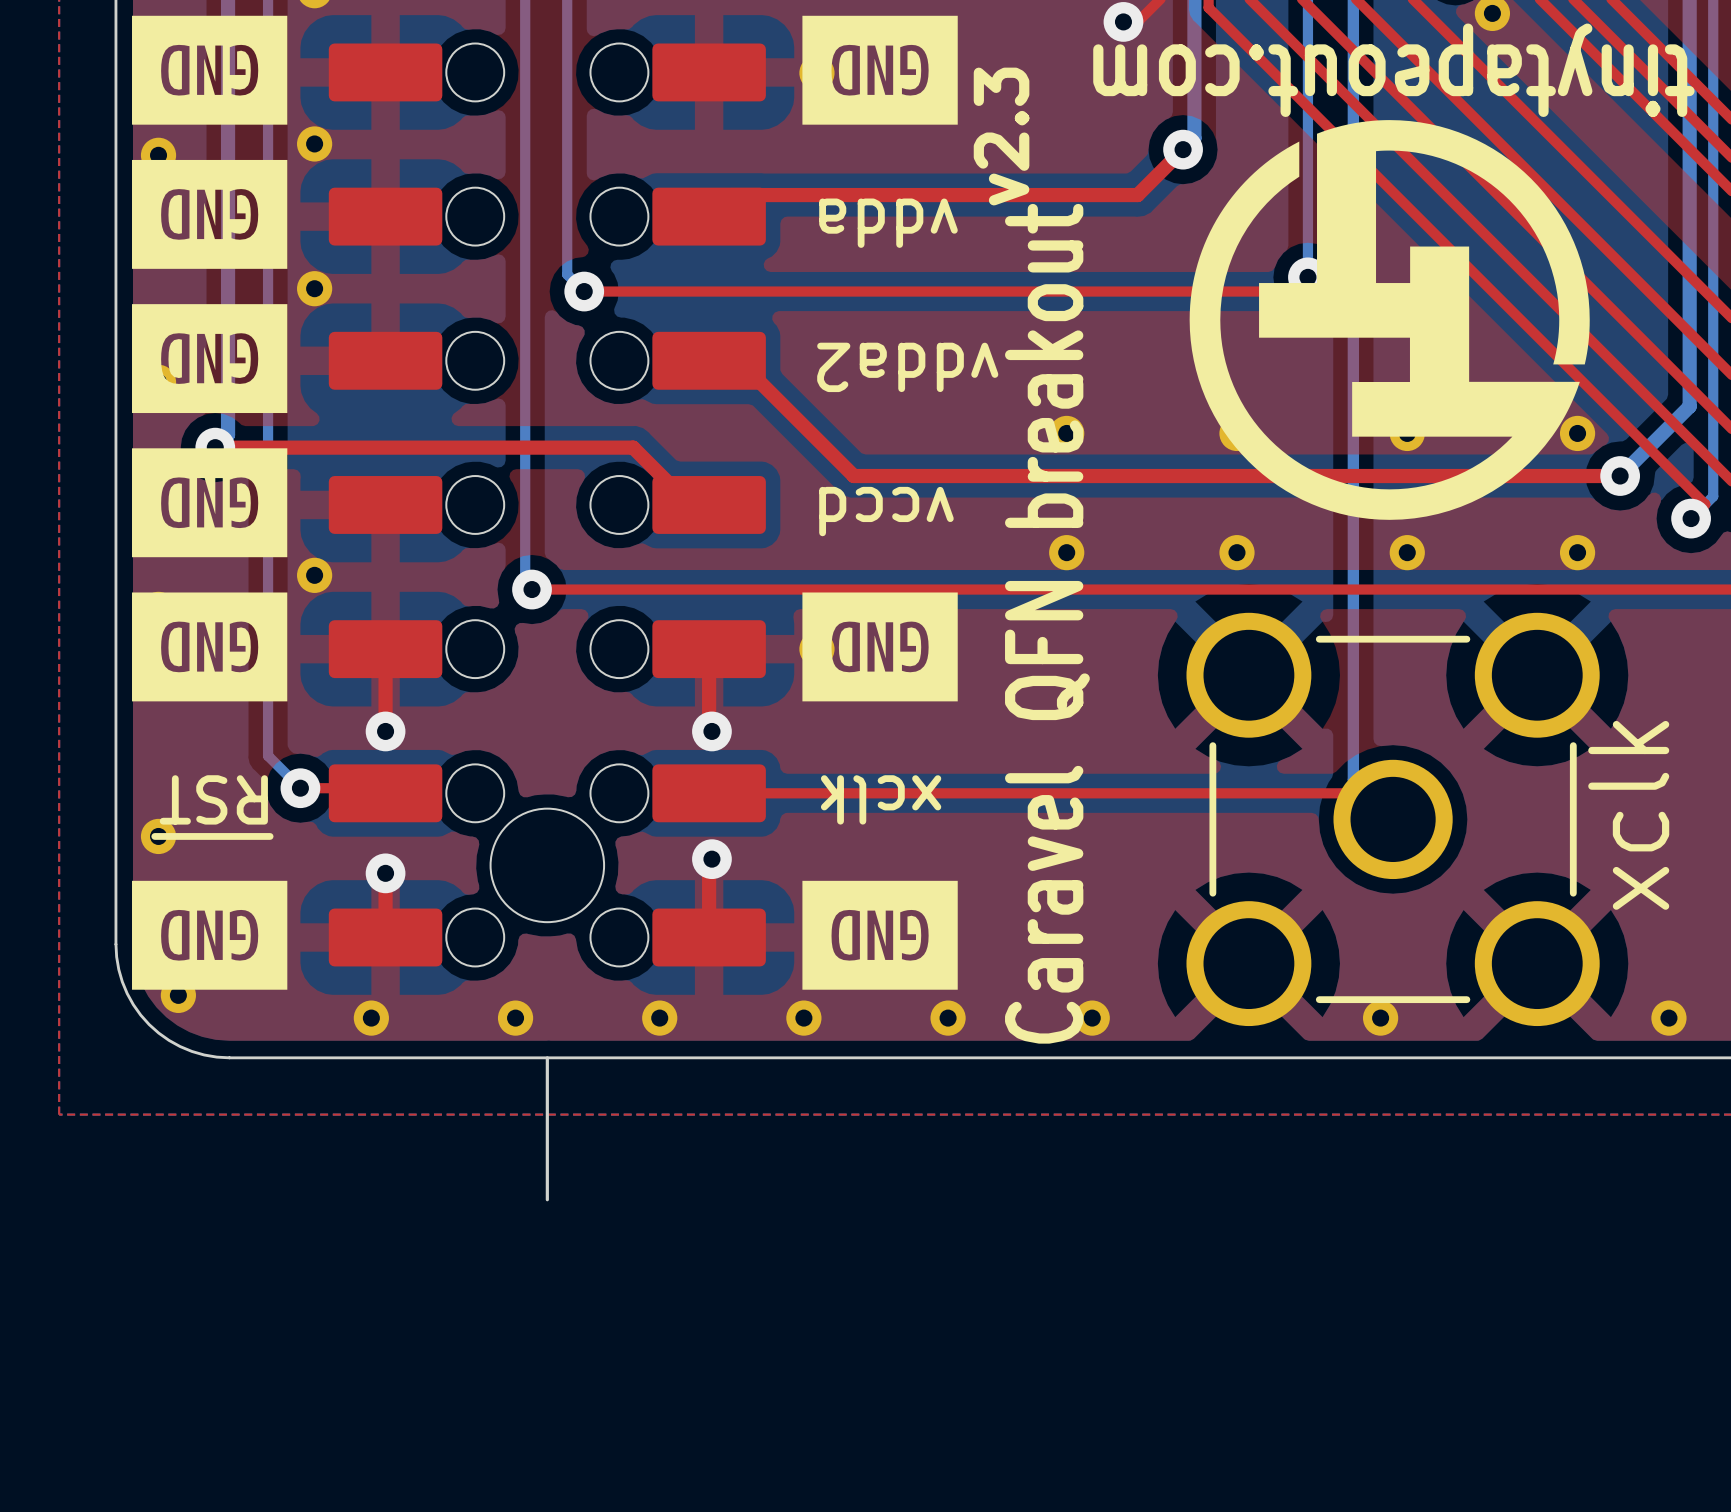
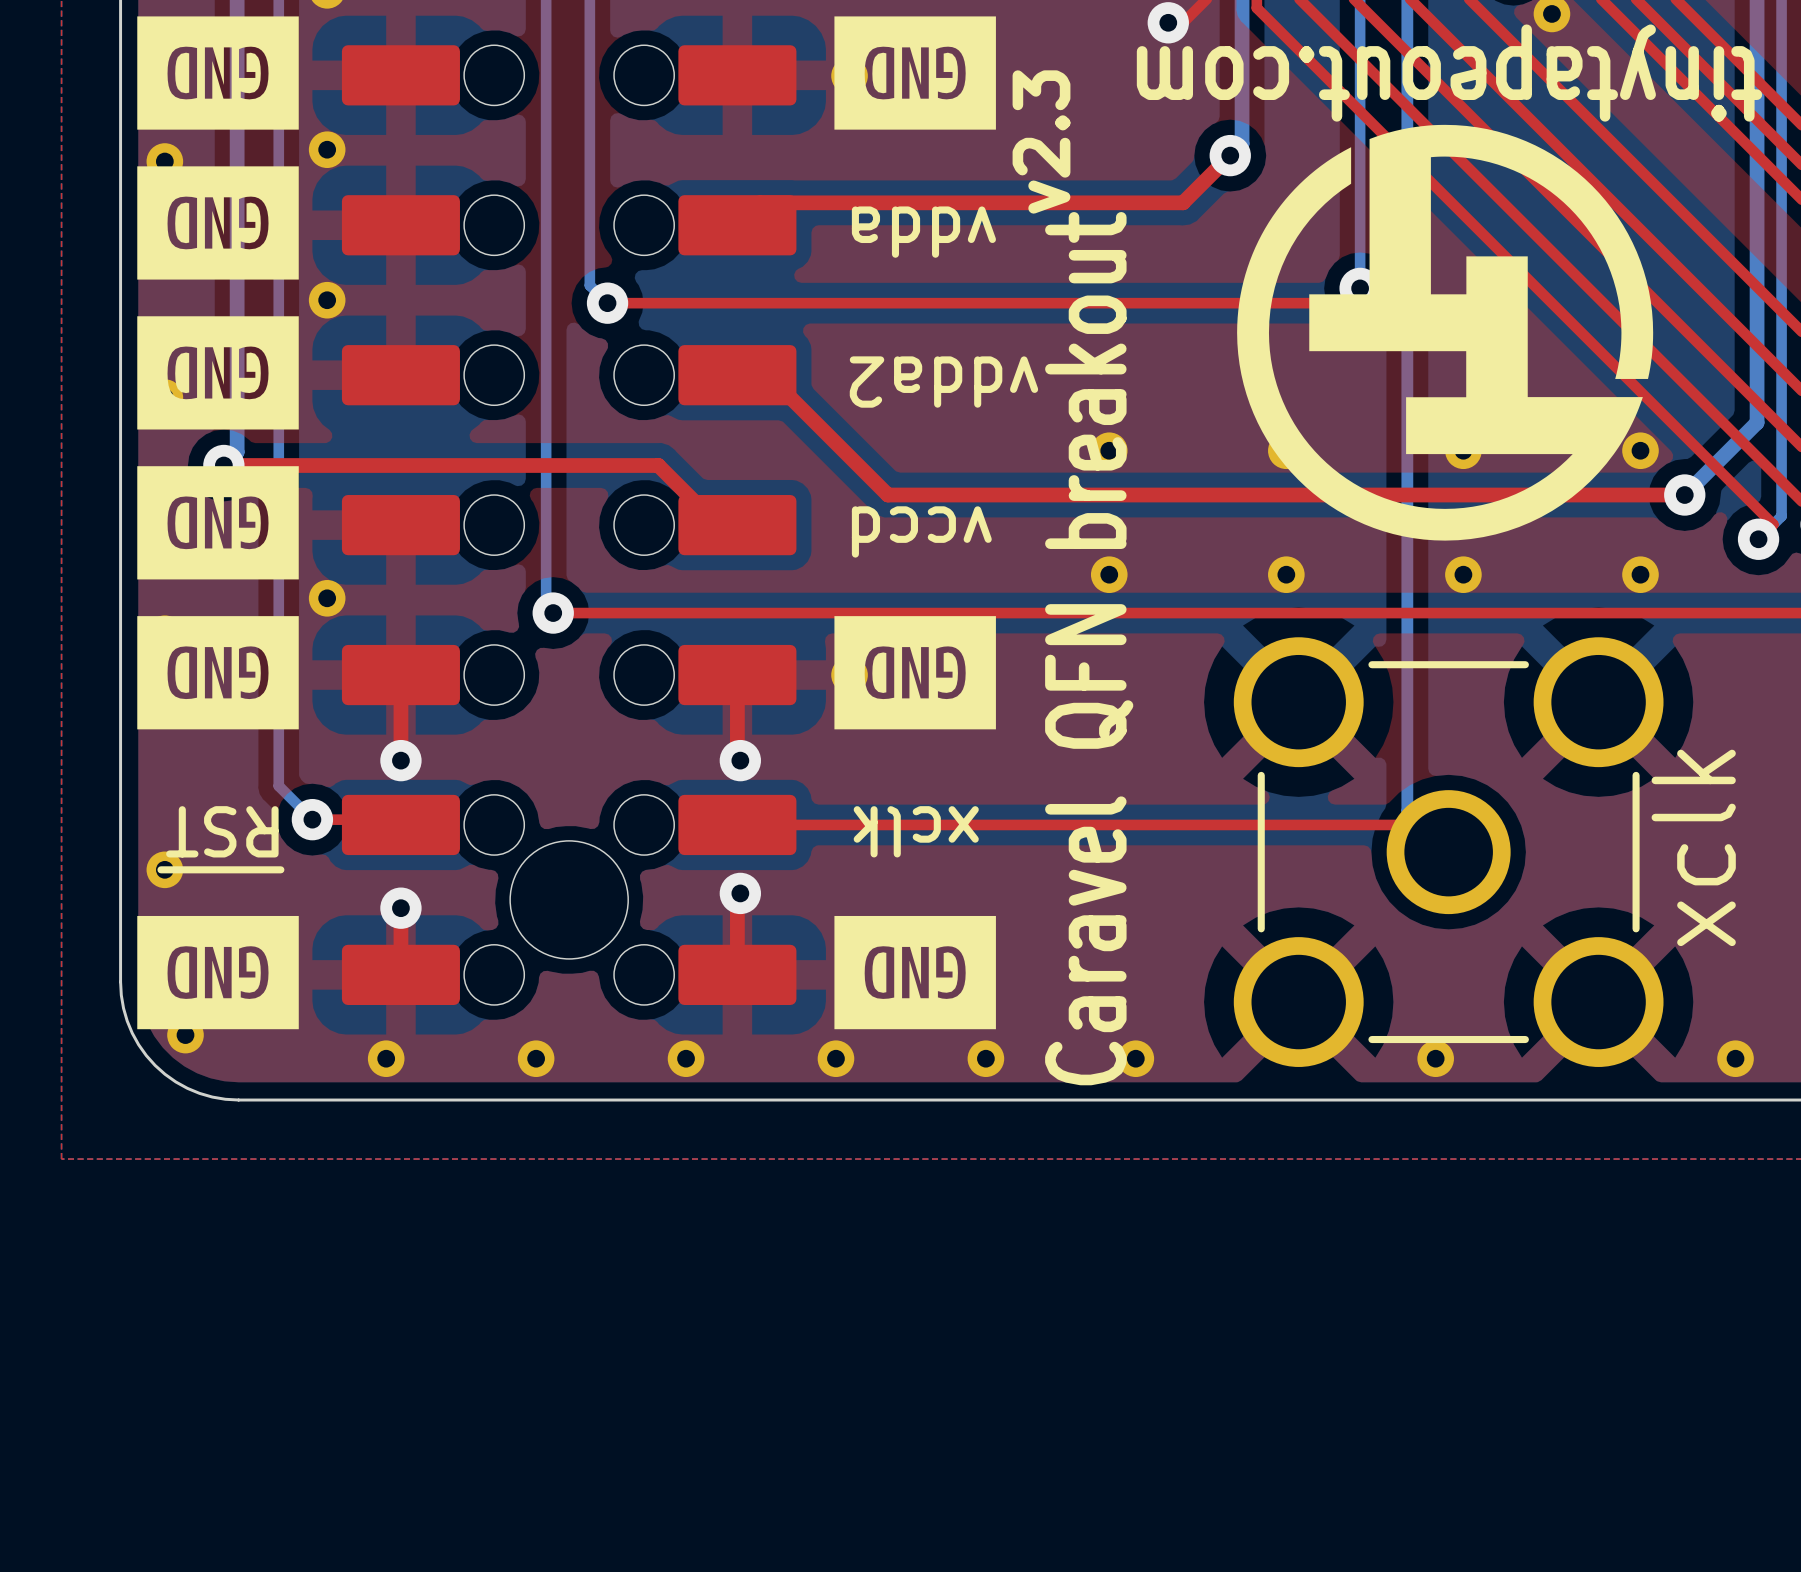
board edge: (547, 1057) (547, 1199) -> none

